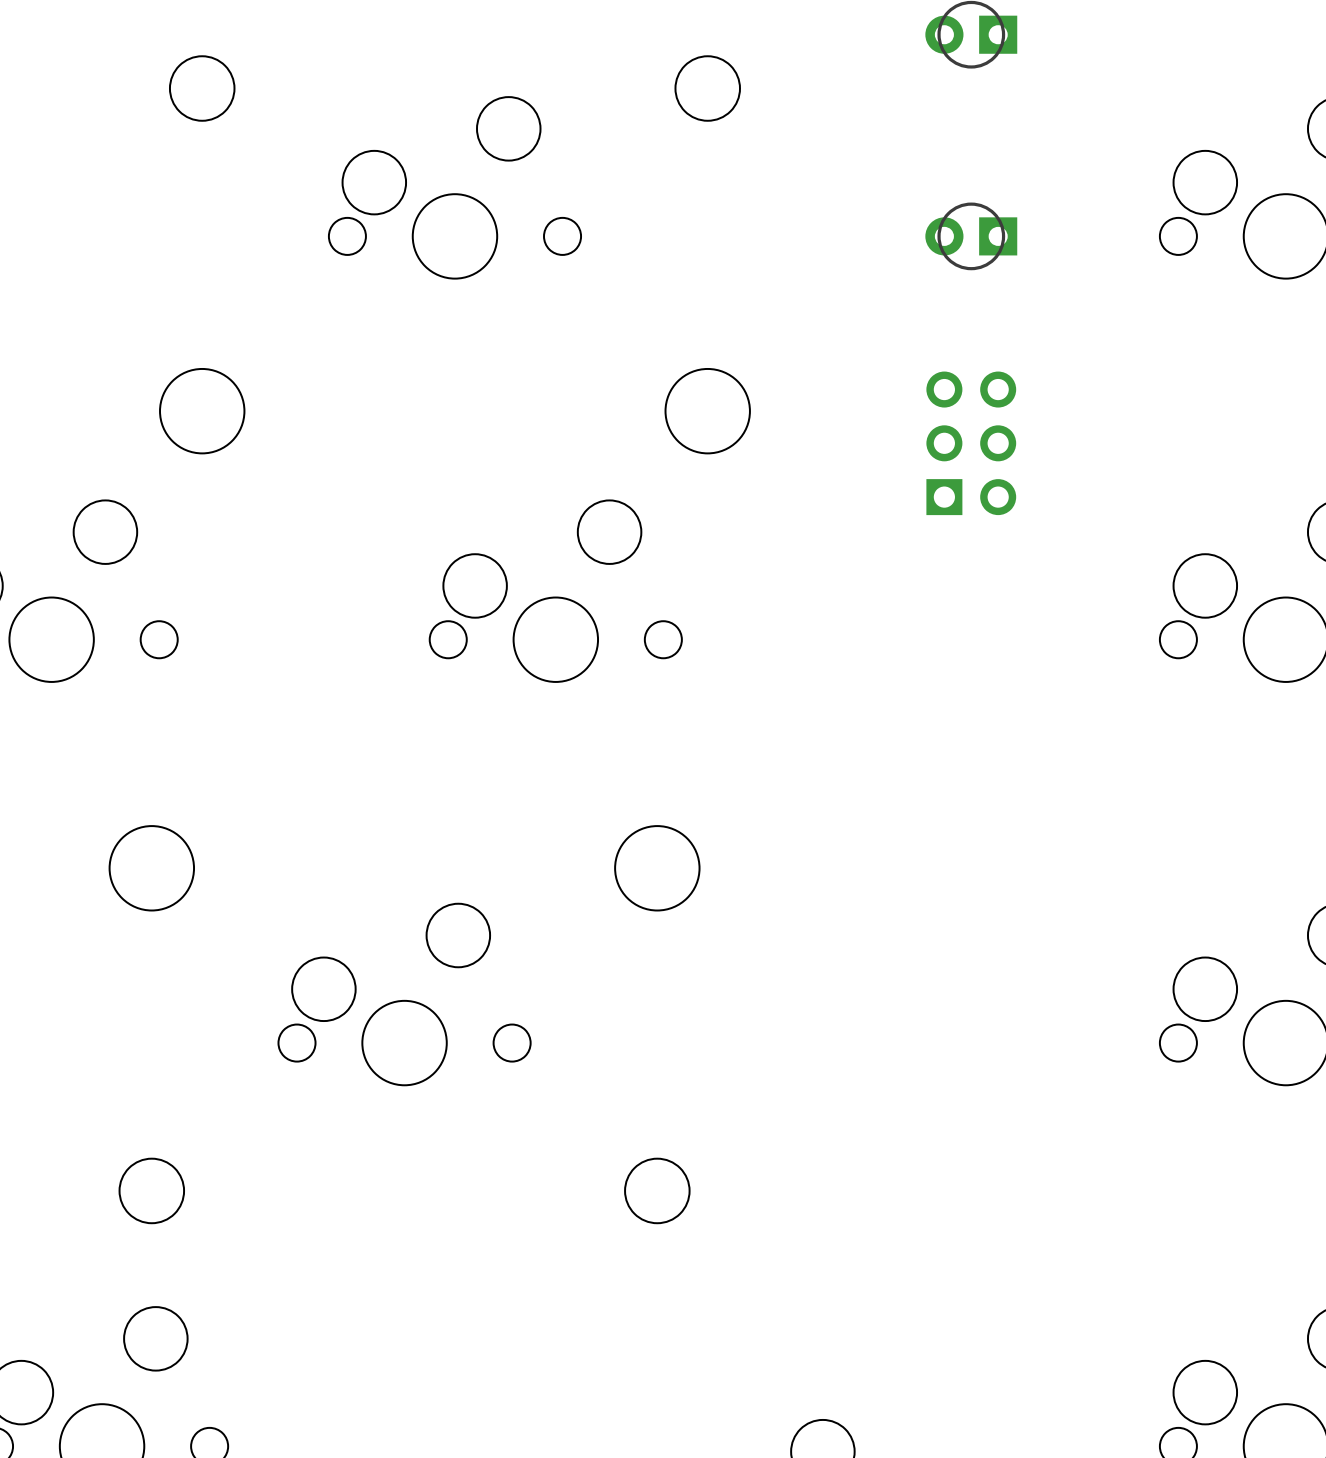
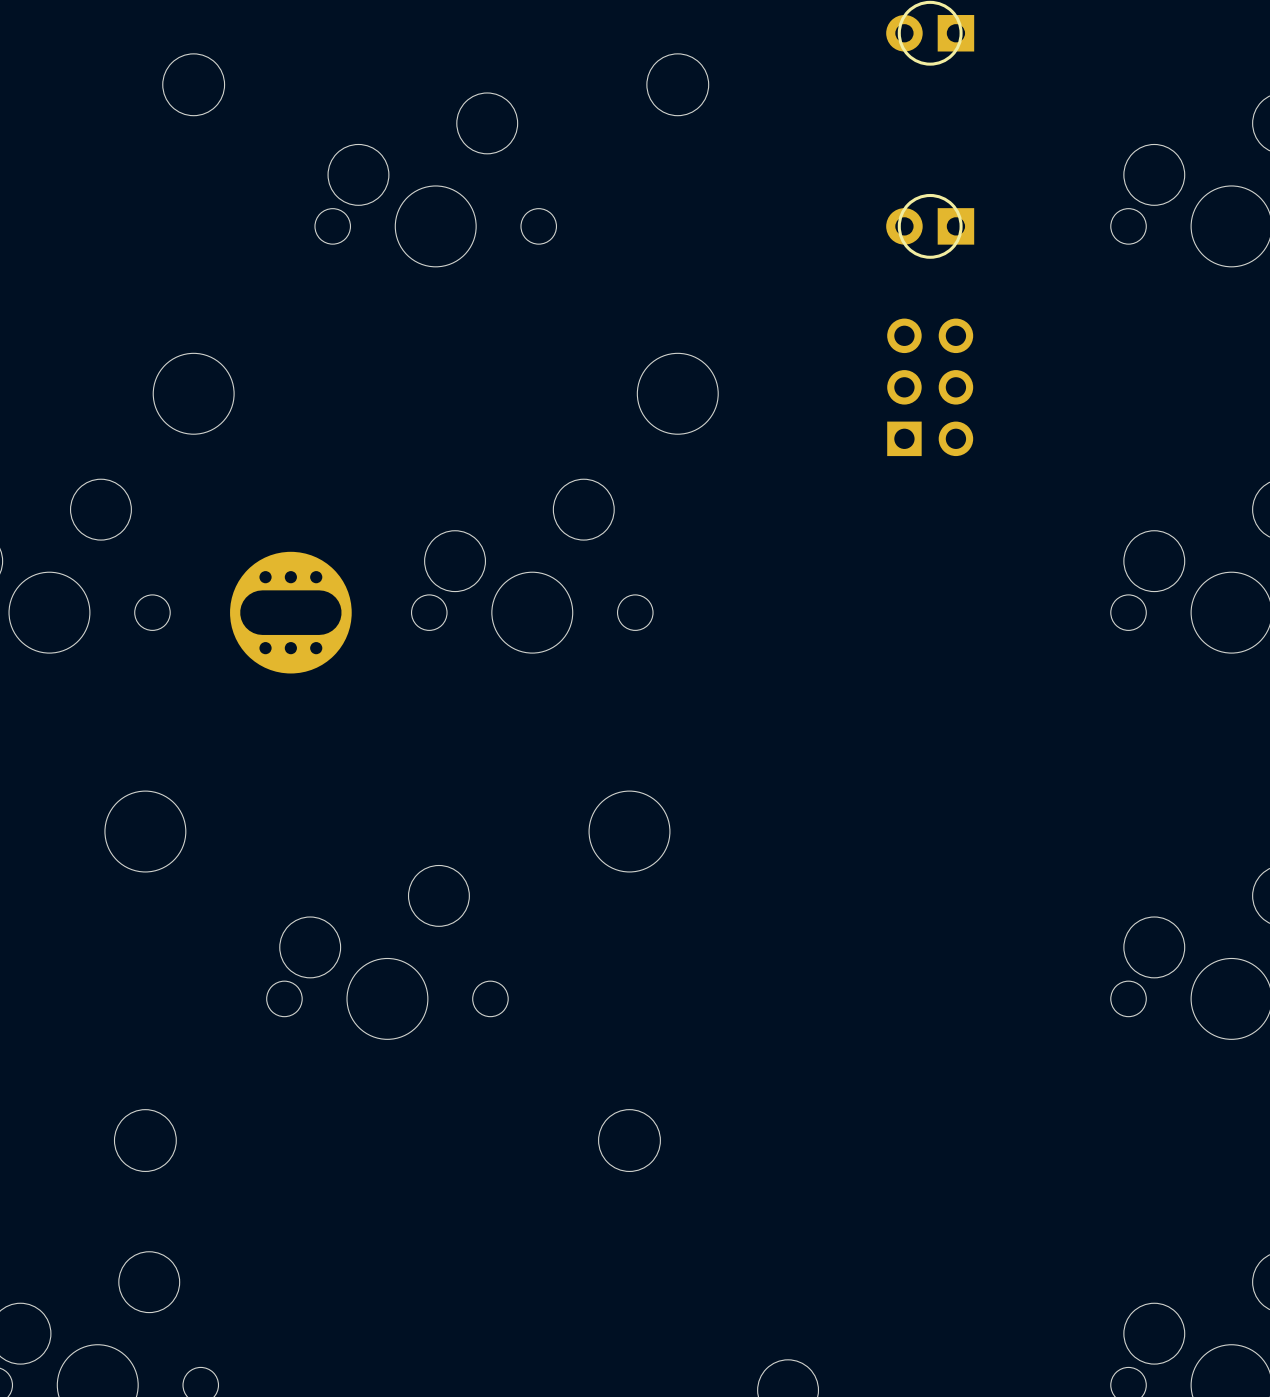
part position: (971, 443) -> (930, 387)
part: none -> (290, 612)

